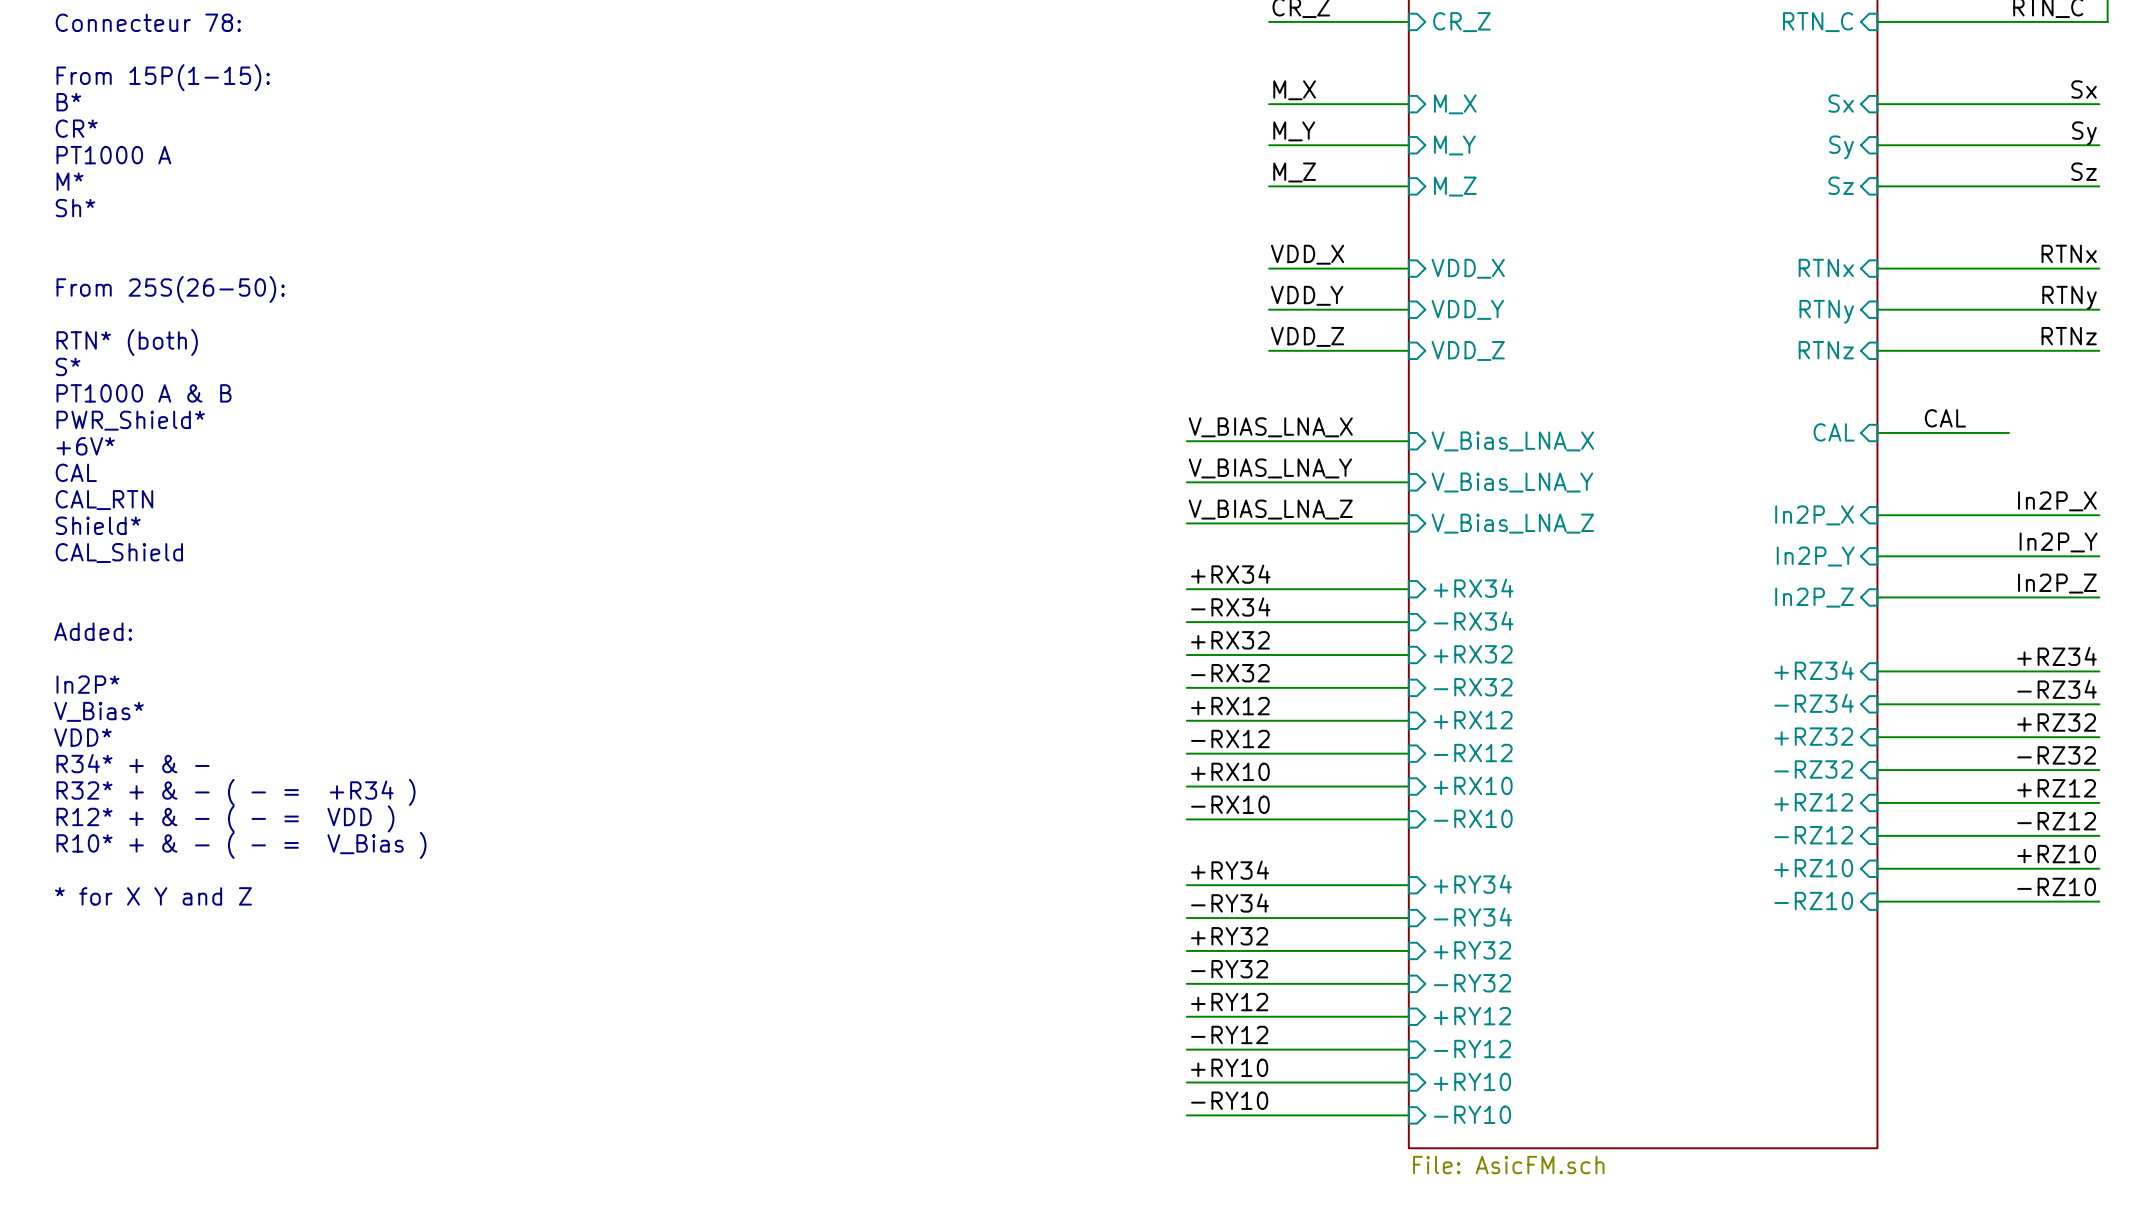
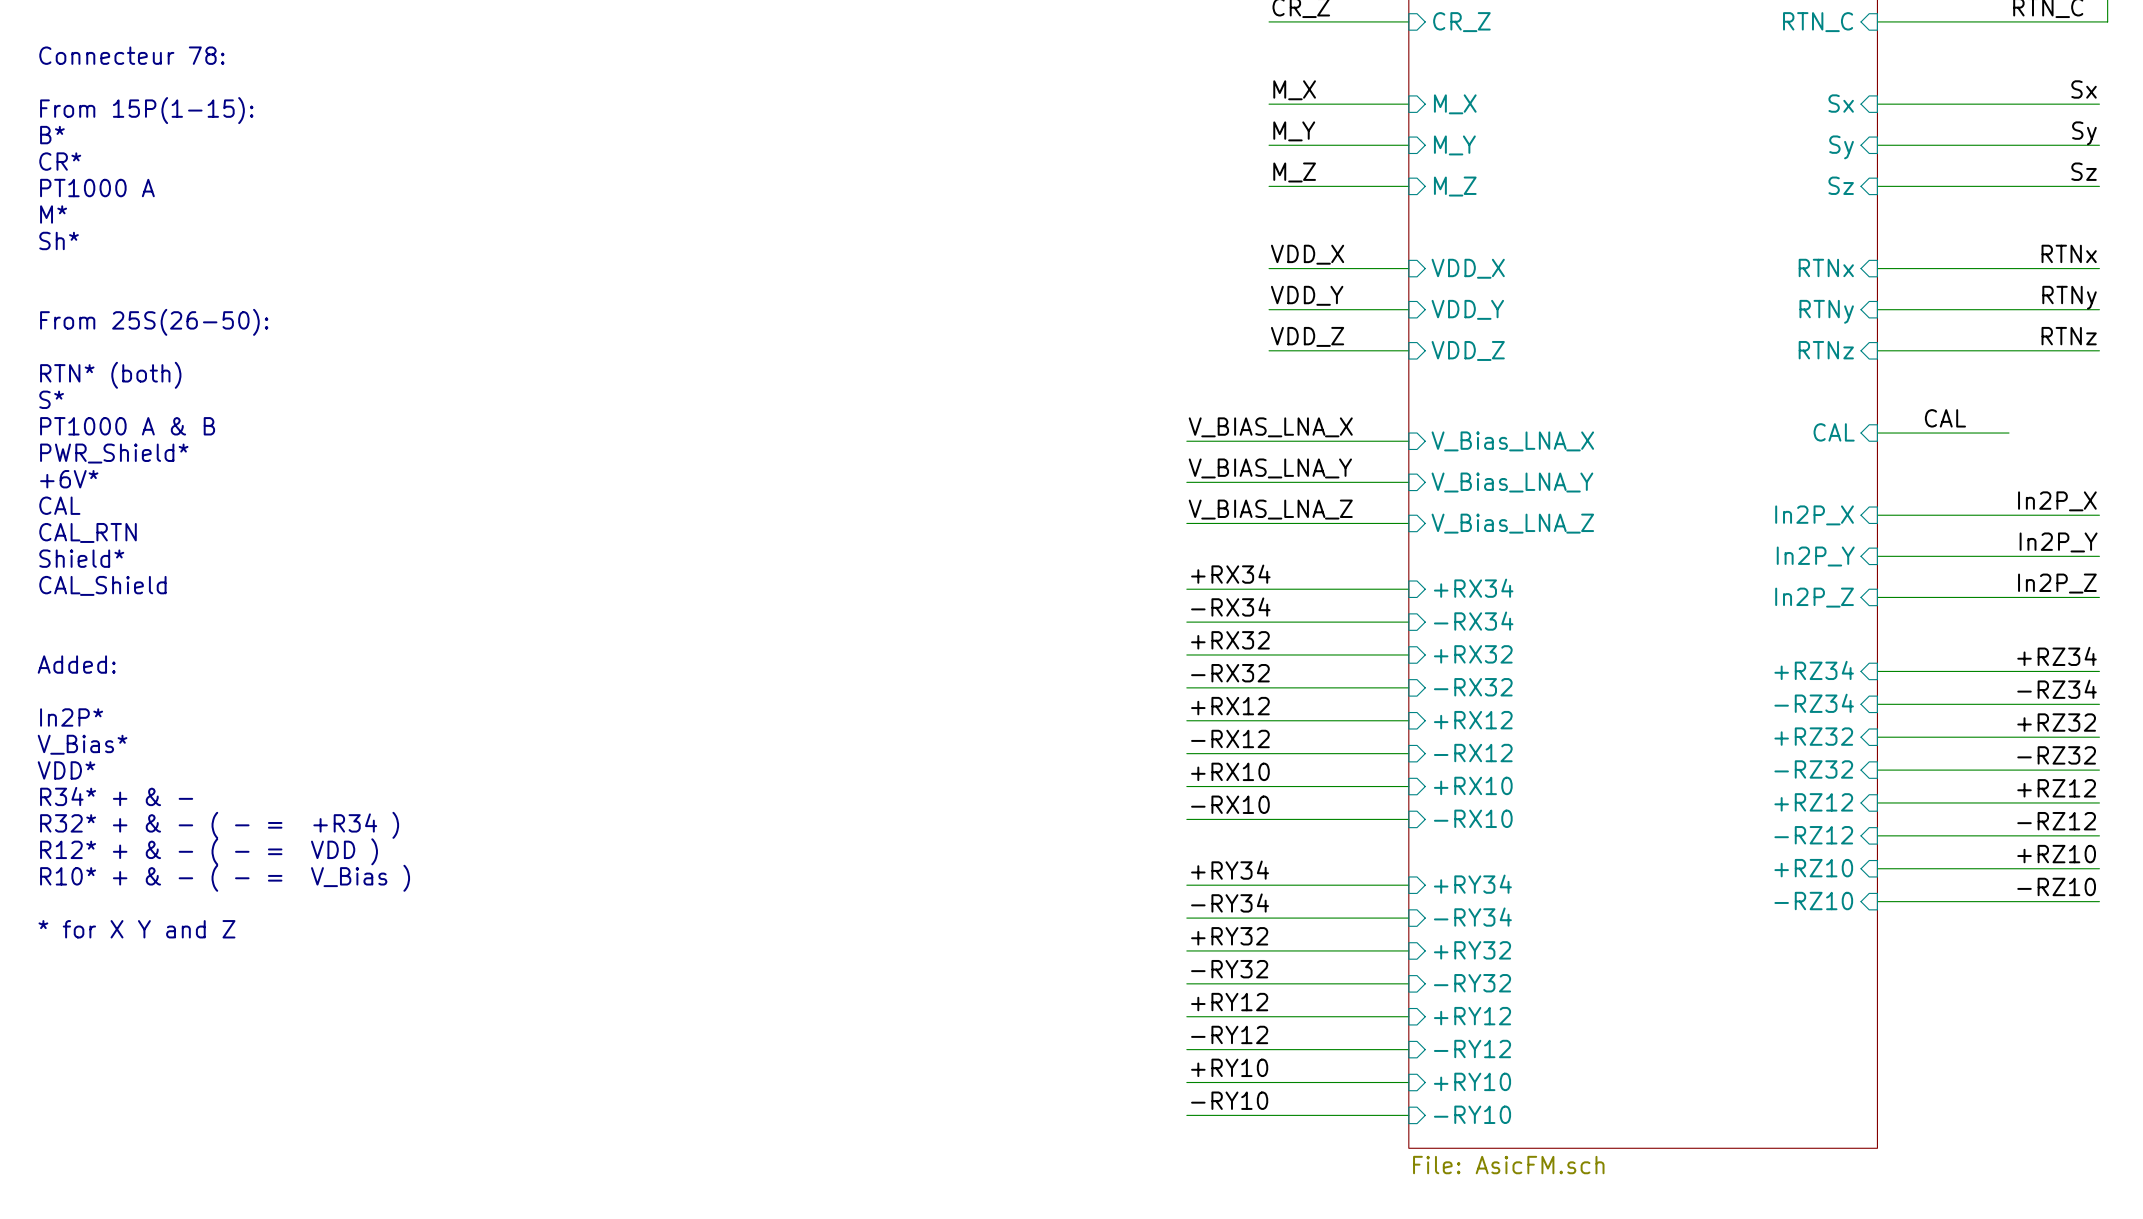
text position: Connecteur 78: (148, 22) -> Connecteur 78: (131, 55)
text position: From 15P(1-15): (163, 77) -> From 15P(1-15): (146, 110)
text position: B* (68, 102) -> B* (52, 135)
text position: CR* (76, 128) -> CR* (60, 161)
text position: PT1000 A (113, 155) -> PT1000 A (97, 188)
text position: M* (70, 181) -> M* (53, 214)
text position: Sh* (75, 208) -> Sh* (59, 240)
text position: From 25S(26-50): (170, 289) -> From 25S(26-50): (154, 322)
text position: RTN* (both) (127, 342) -> RTN* (both) (110, 375)
text position: S* (68, 366) -> S* (51, 399)
text position: PT1000 A & B (144, 393) -> PT1000 A & B (127, 426)
text position: PWR_Shield* (130, 420) -> PWR_Shield* (114, 453)
text position: +6V* (85, 446) -> +6V* (69, 479)
text position: CAL (76, 472) -> CAL (59, 505)
text position: CAL_RTN (104, 500) -> CAL_RTN (88, 532)
text position: Shield* (98, 525) -> Shield* (81, 558)
text position: CAL_Shield (119, 553) -> CAL_Shield (102, 585)
text position: Added: (93, 631) -> Added: (76, 664)
text position: In2P* (88, 684) -> In2P* (71, 717)
text position: V_Bias* (99, 711) -> V_Bias* (82, 744)
text position: VDD* (82, 737) -> VDD* (66, 770)
text position: R34* + & - (133, 763) -> R34* + & - (116, 796)
text position: R32* + & - ( - = +R34 ) (236, 792) -> R32* + & - ( - = +R34 ) (219, 825)
text position: R12* + & - ( - = VDD ) (225, 818) -> R12* + & - ( - = VDD ) (209, 851)
text position: R10* + & - ( - = V_Bias ) (241, 845) -> R10* + & - ( - = V_Bias ) (225, 878)
text position: * for X Y and Z (153, 896) -> * for X Y and Z (136, 929)

